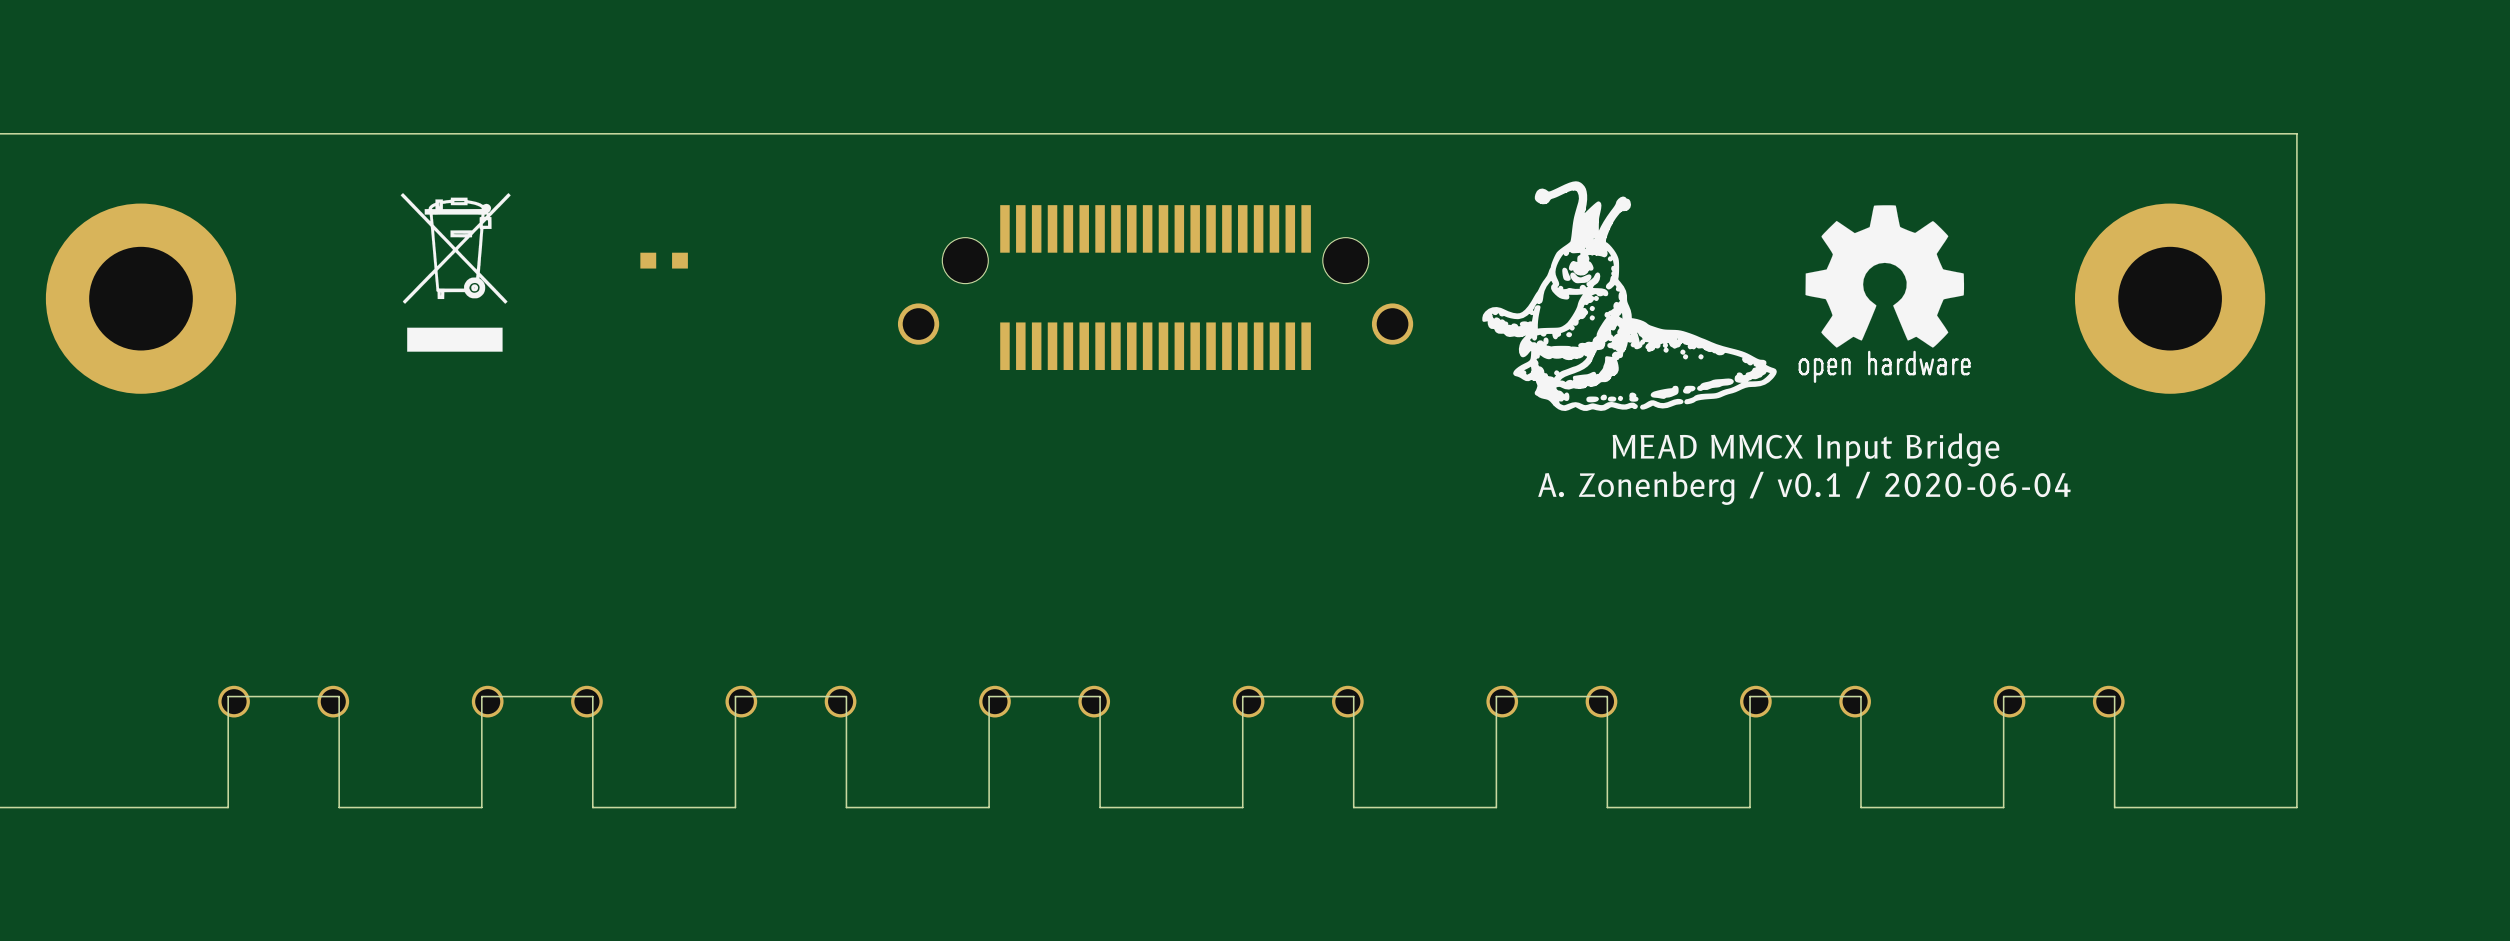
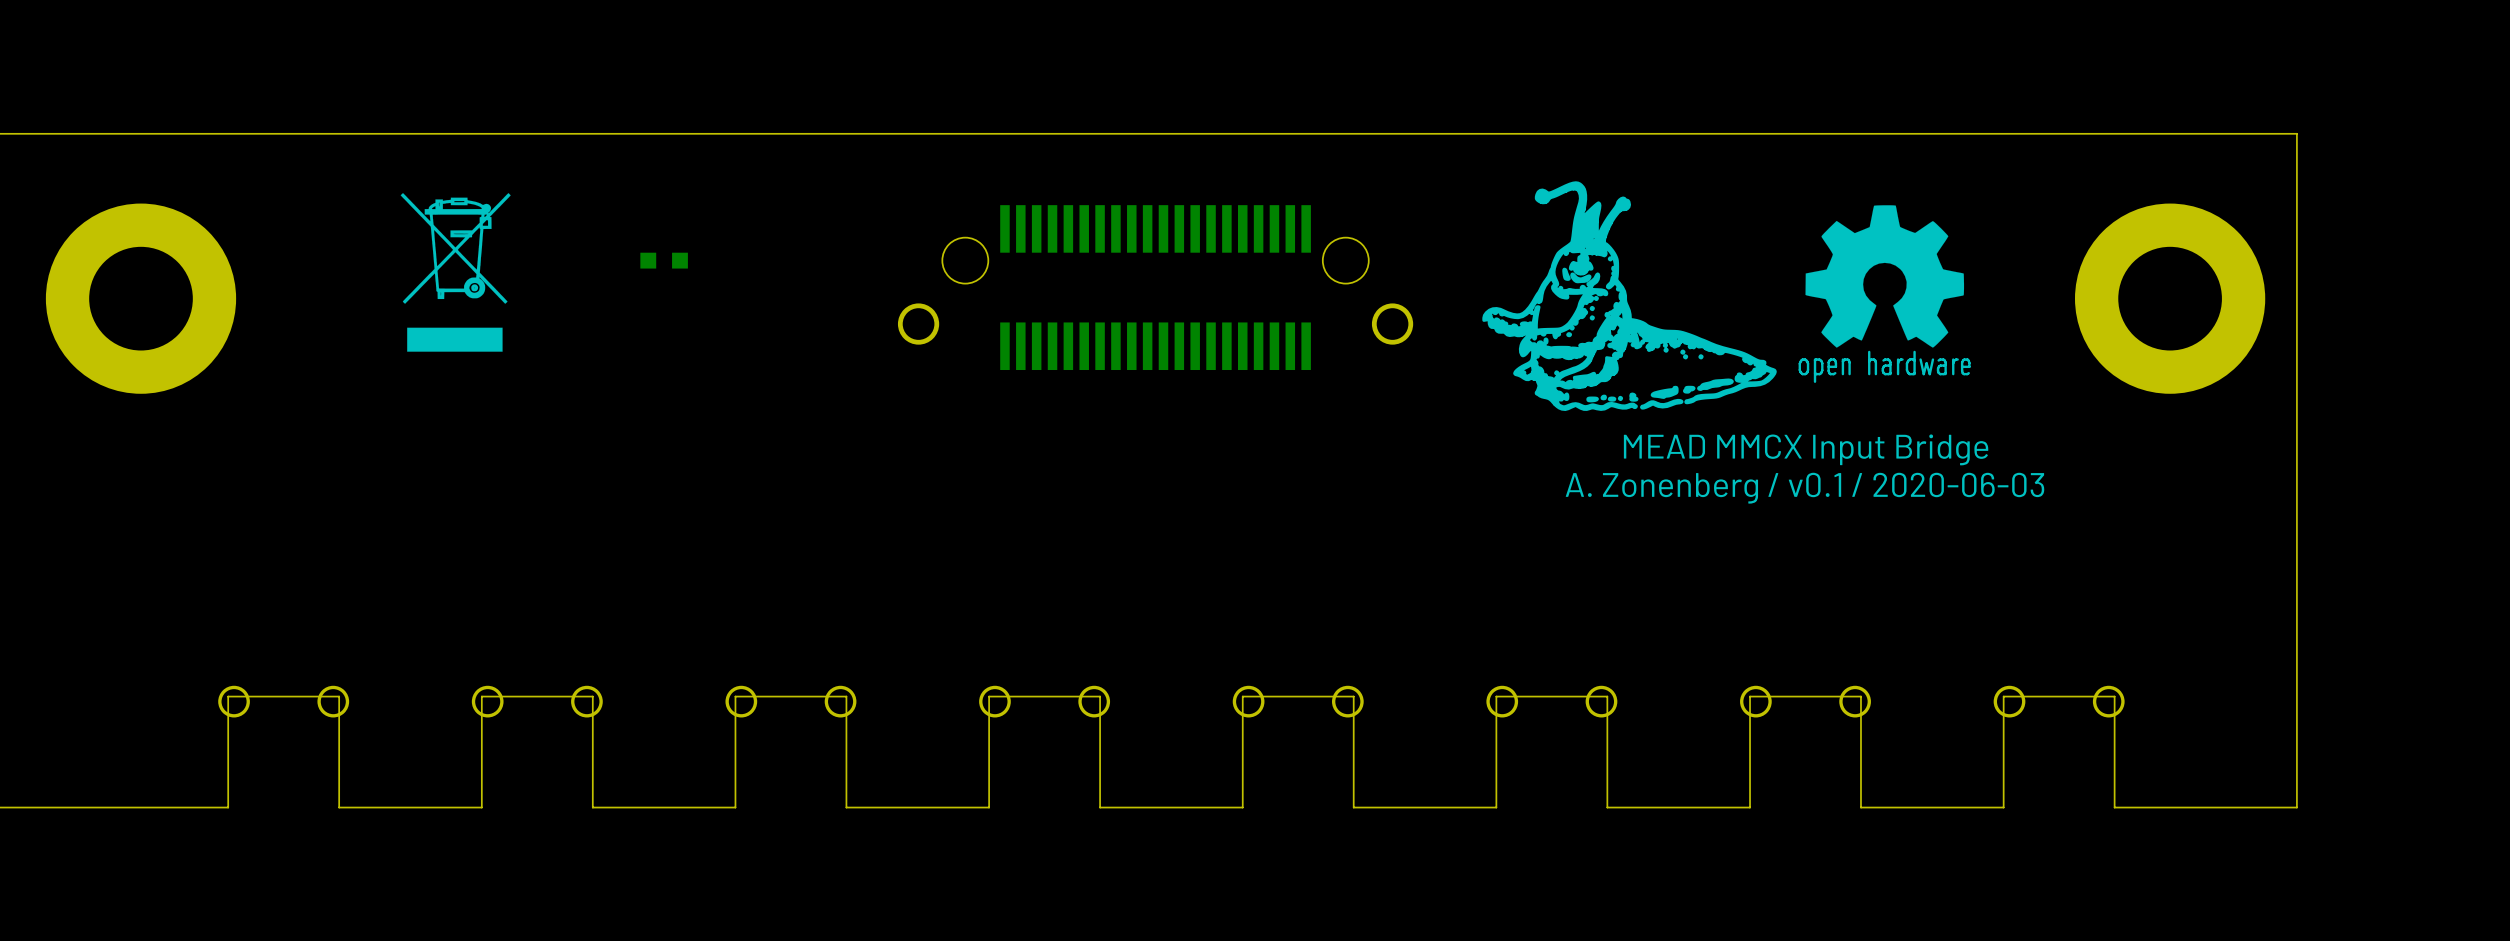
text: A. Zonenberg / v0.1 / 2020-06-04 (1804, 488) -> A. Zonenberg / v0.1 / 2020-06-03 (1804, 488)

